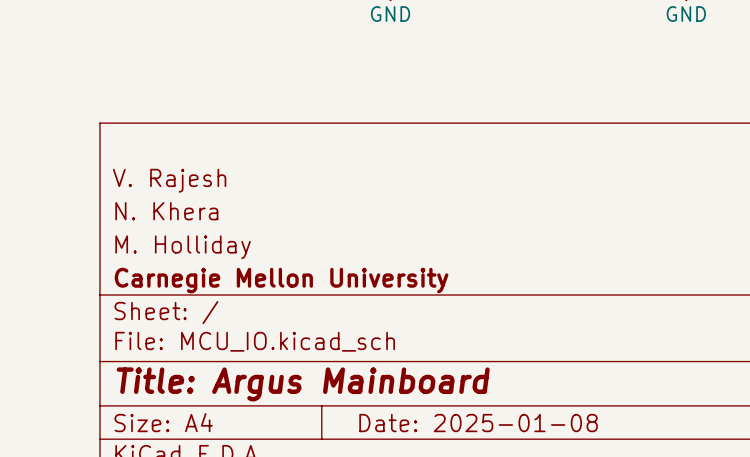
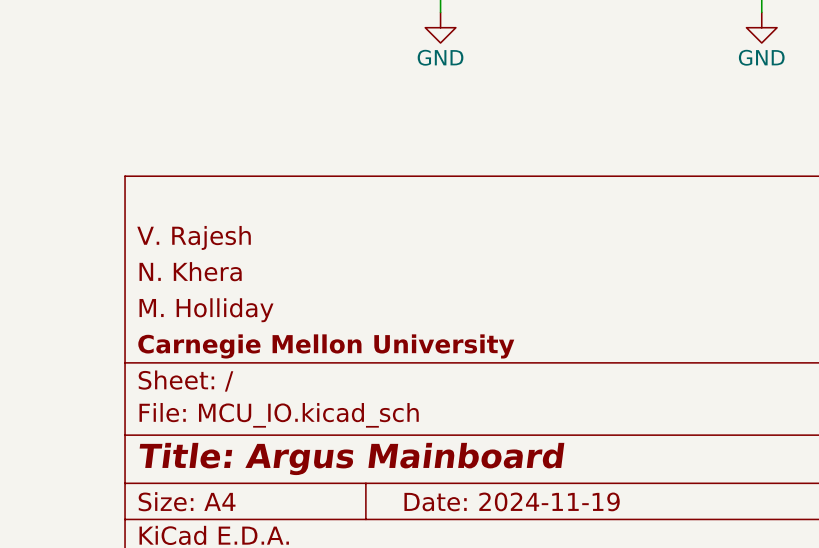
title block: Date: 2025-01-08 (478, 423) -> Date: 2024-11-19 (512, 501)

